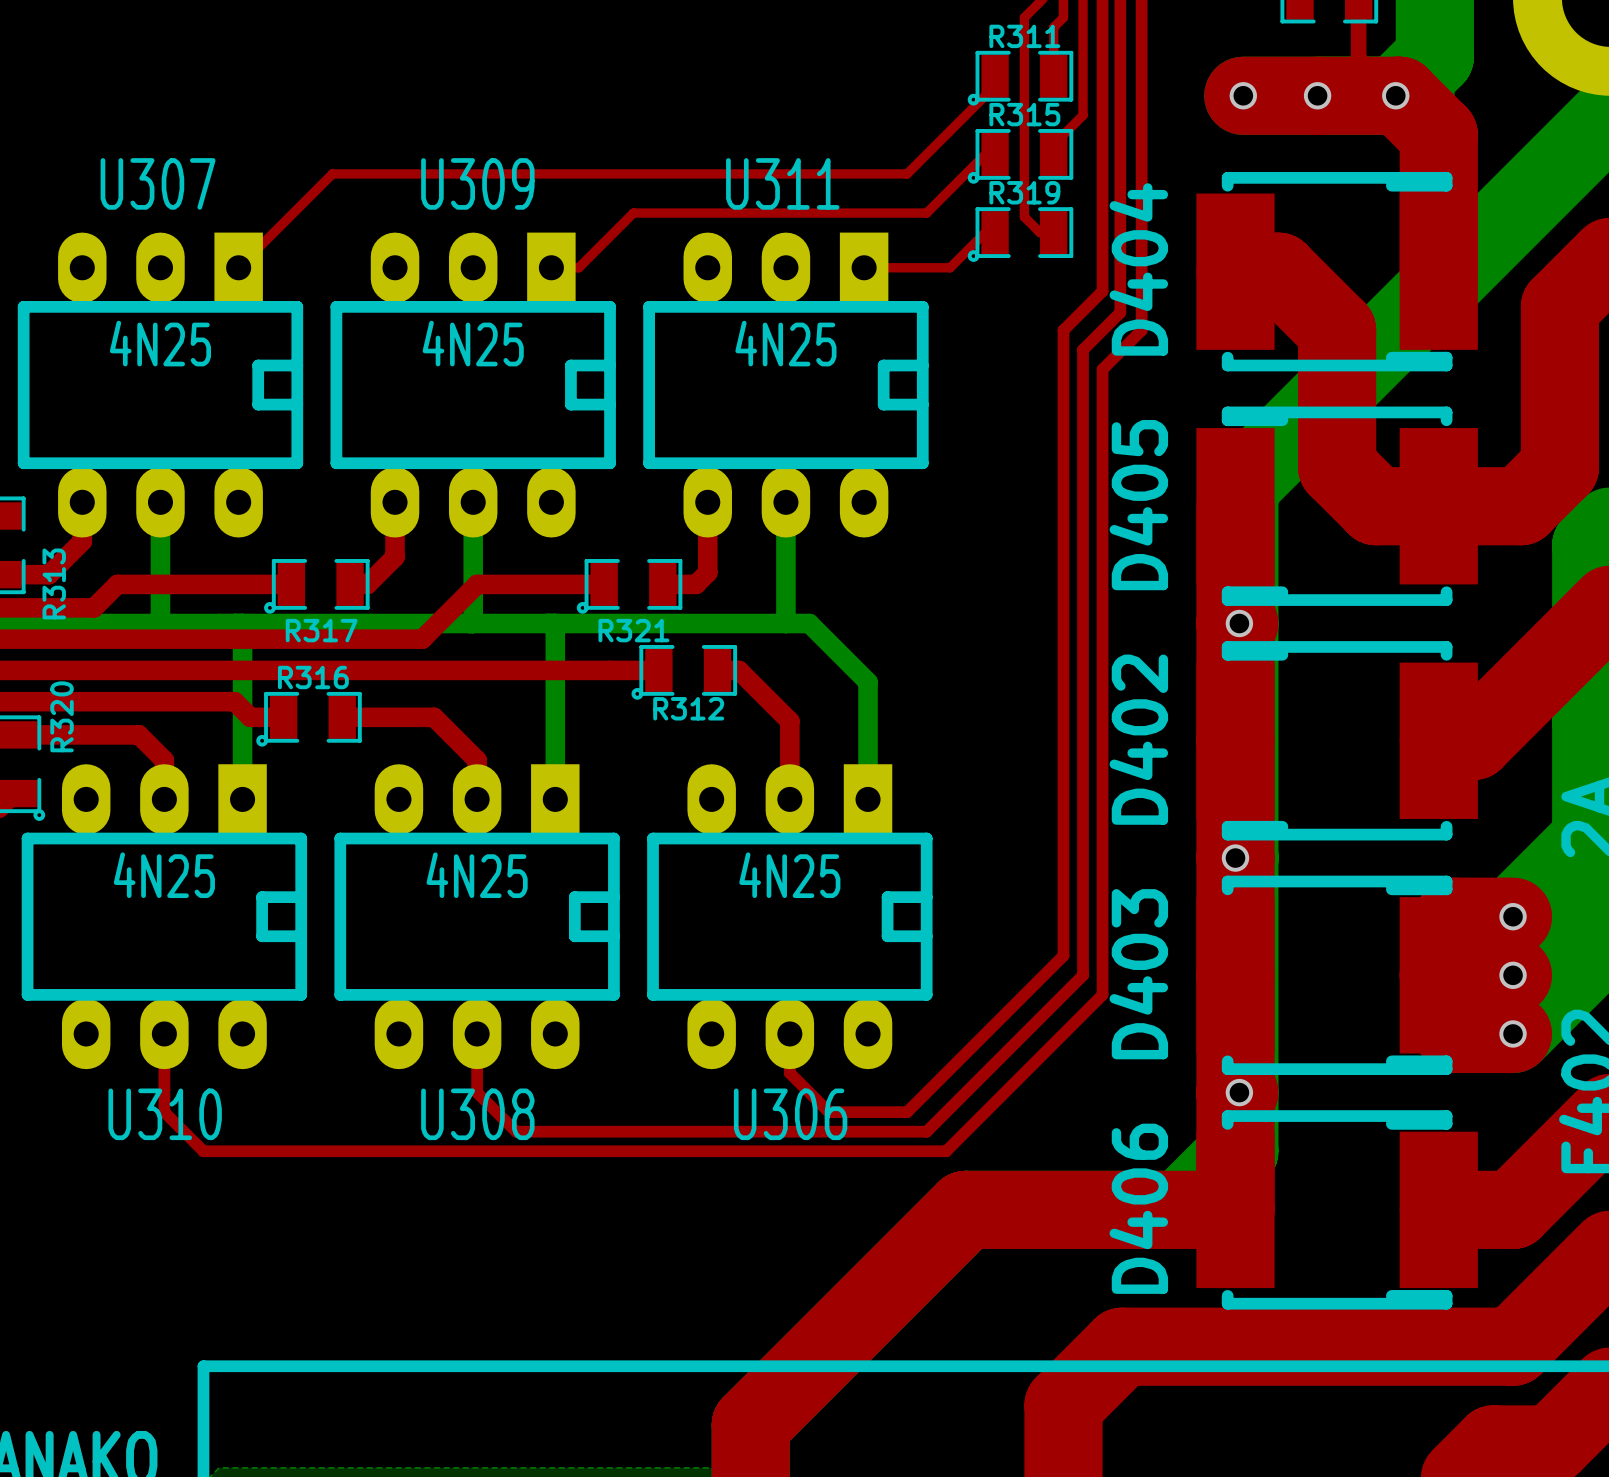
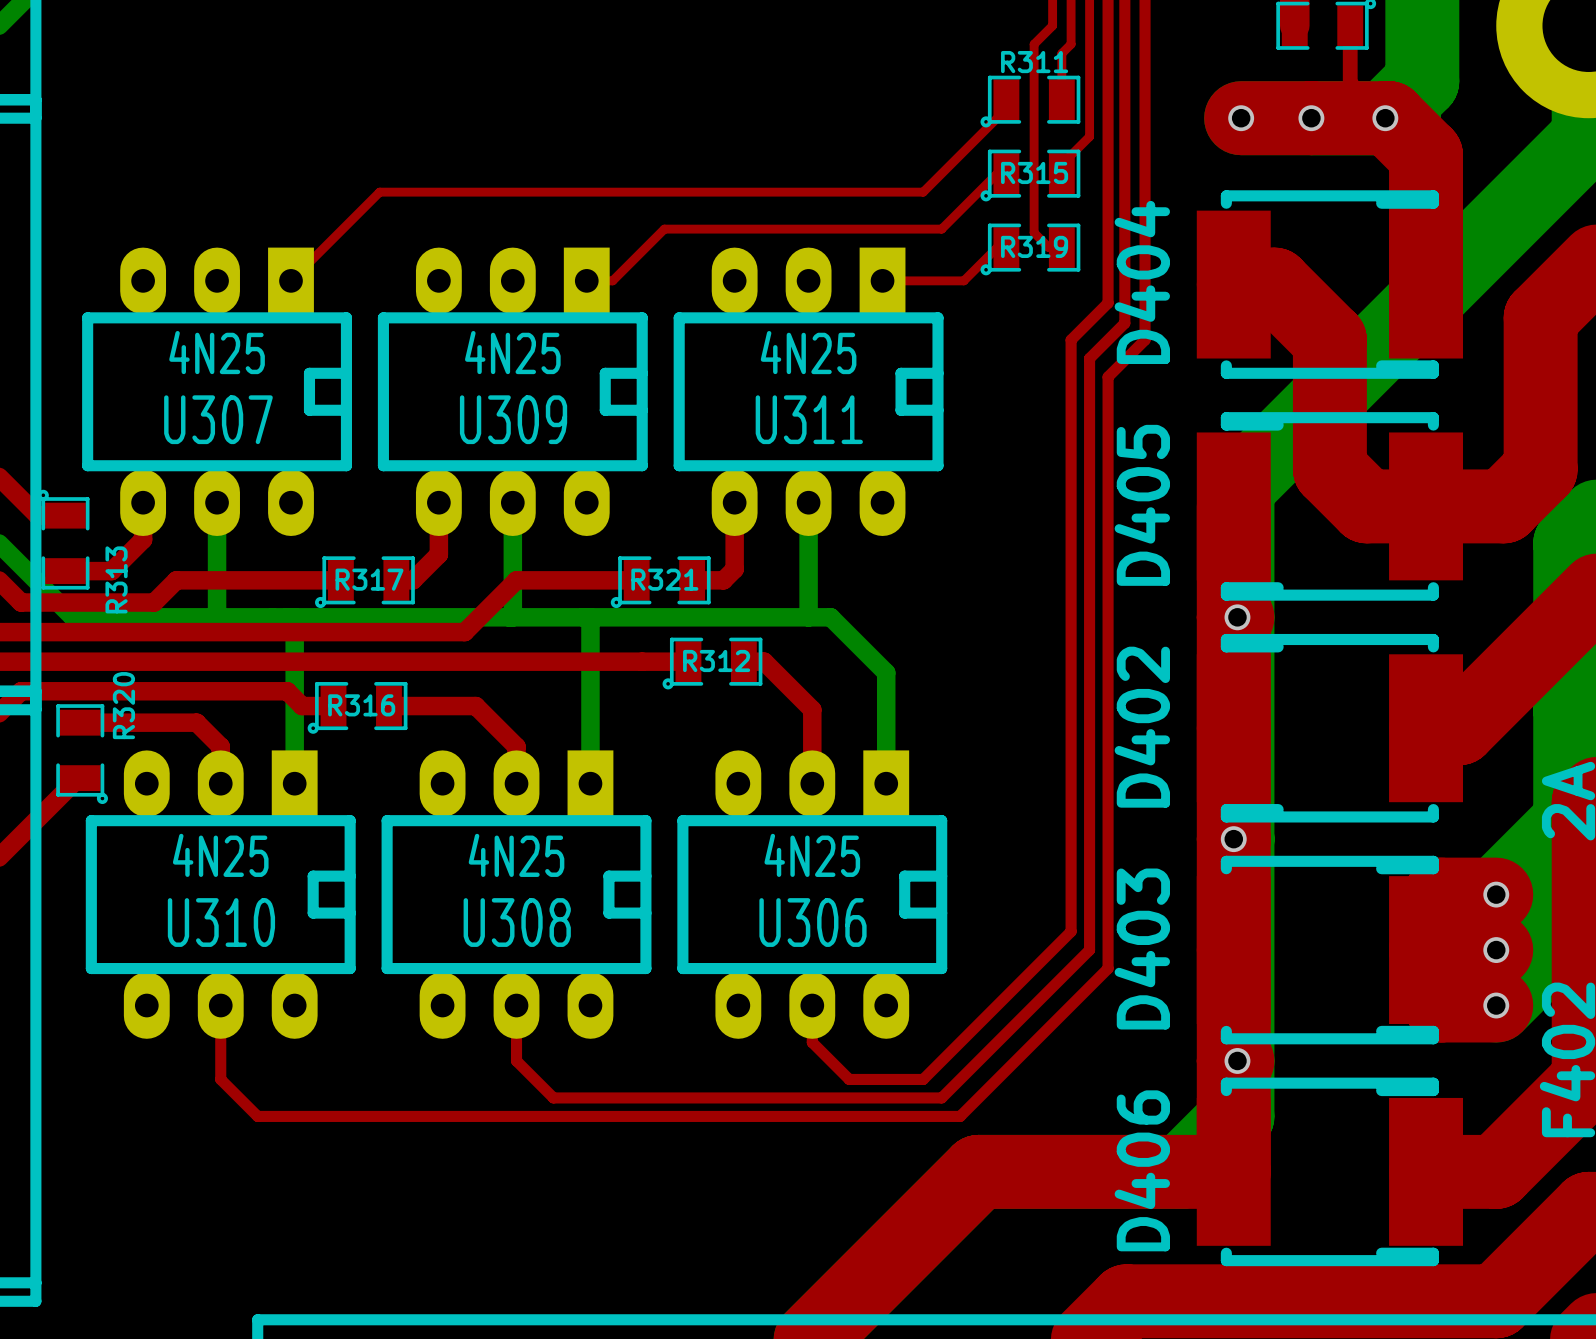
R315 name position: R315 (1024, 114) -> R315 (1034, 172)
U307 name position: U307 (158, 183) -> U307 (218, 419)
U309 name position: U309 (477, 183) -> U309 (513, 419)
U311 name position: U311 (782, 183) -> U311 (809, 419)
R319 name position: R319 (1024, 192) -> R319 (1034, 246)
R317 name position: R317 (321, 630) -> R317 (369, 579)
R321 name position: R321 (633, 630) -> R321 (664, 579)
R316 name position: R316 (313, 677) -> R316 (361, 705)
R312 name position: R312 (688, 708) -> R312 (716, 660)
U310 name position: U310 (165, 1114) -> U310 (221, 922)
U308 name position: U308 (477, 1114) -> U308 (517, 922)
U306 name position: U306 (790, 1114) -> U306 (813, 922)

